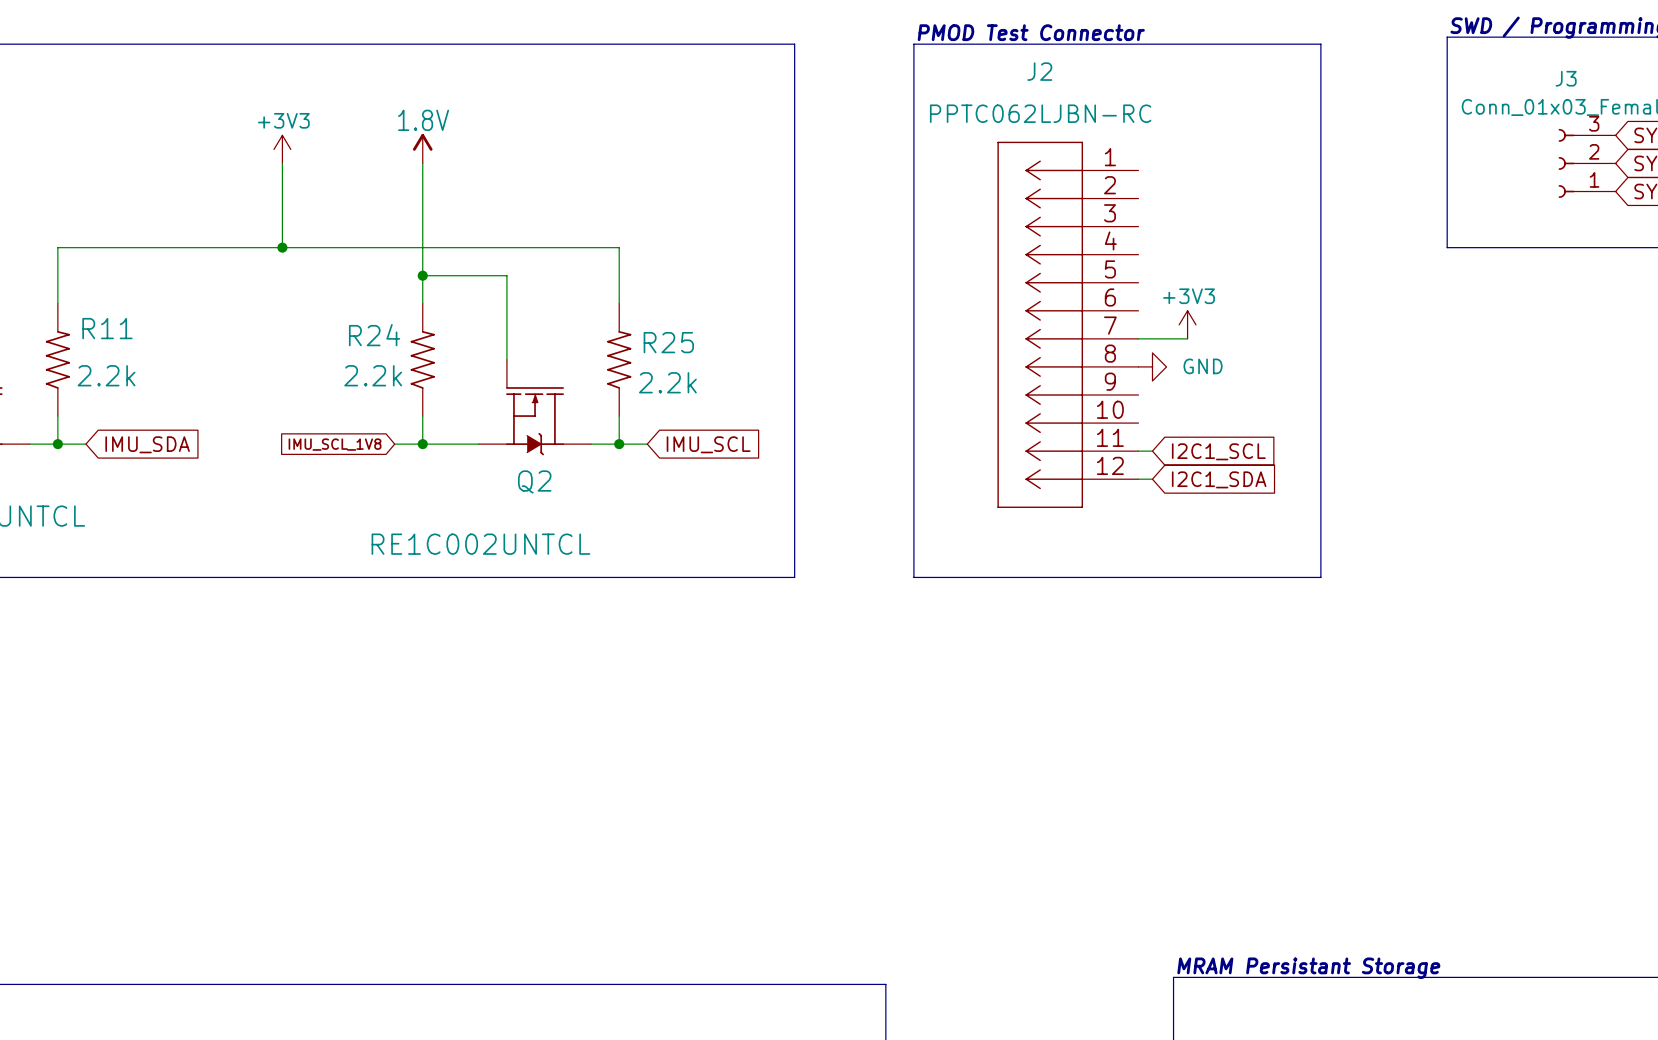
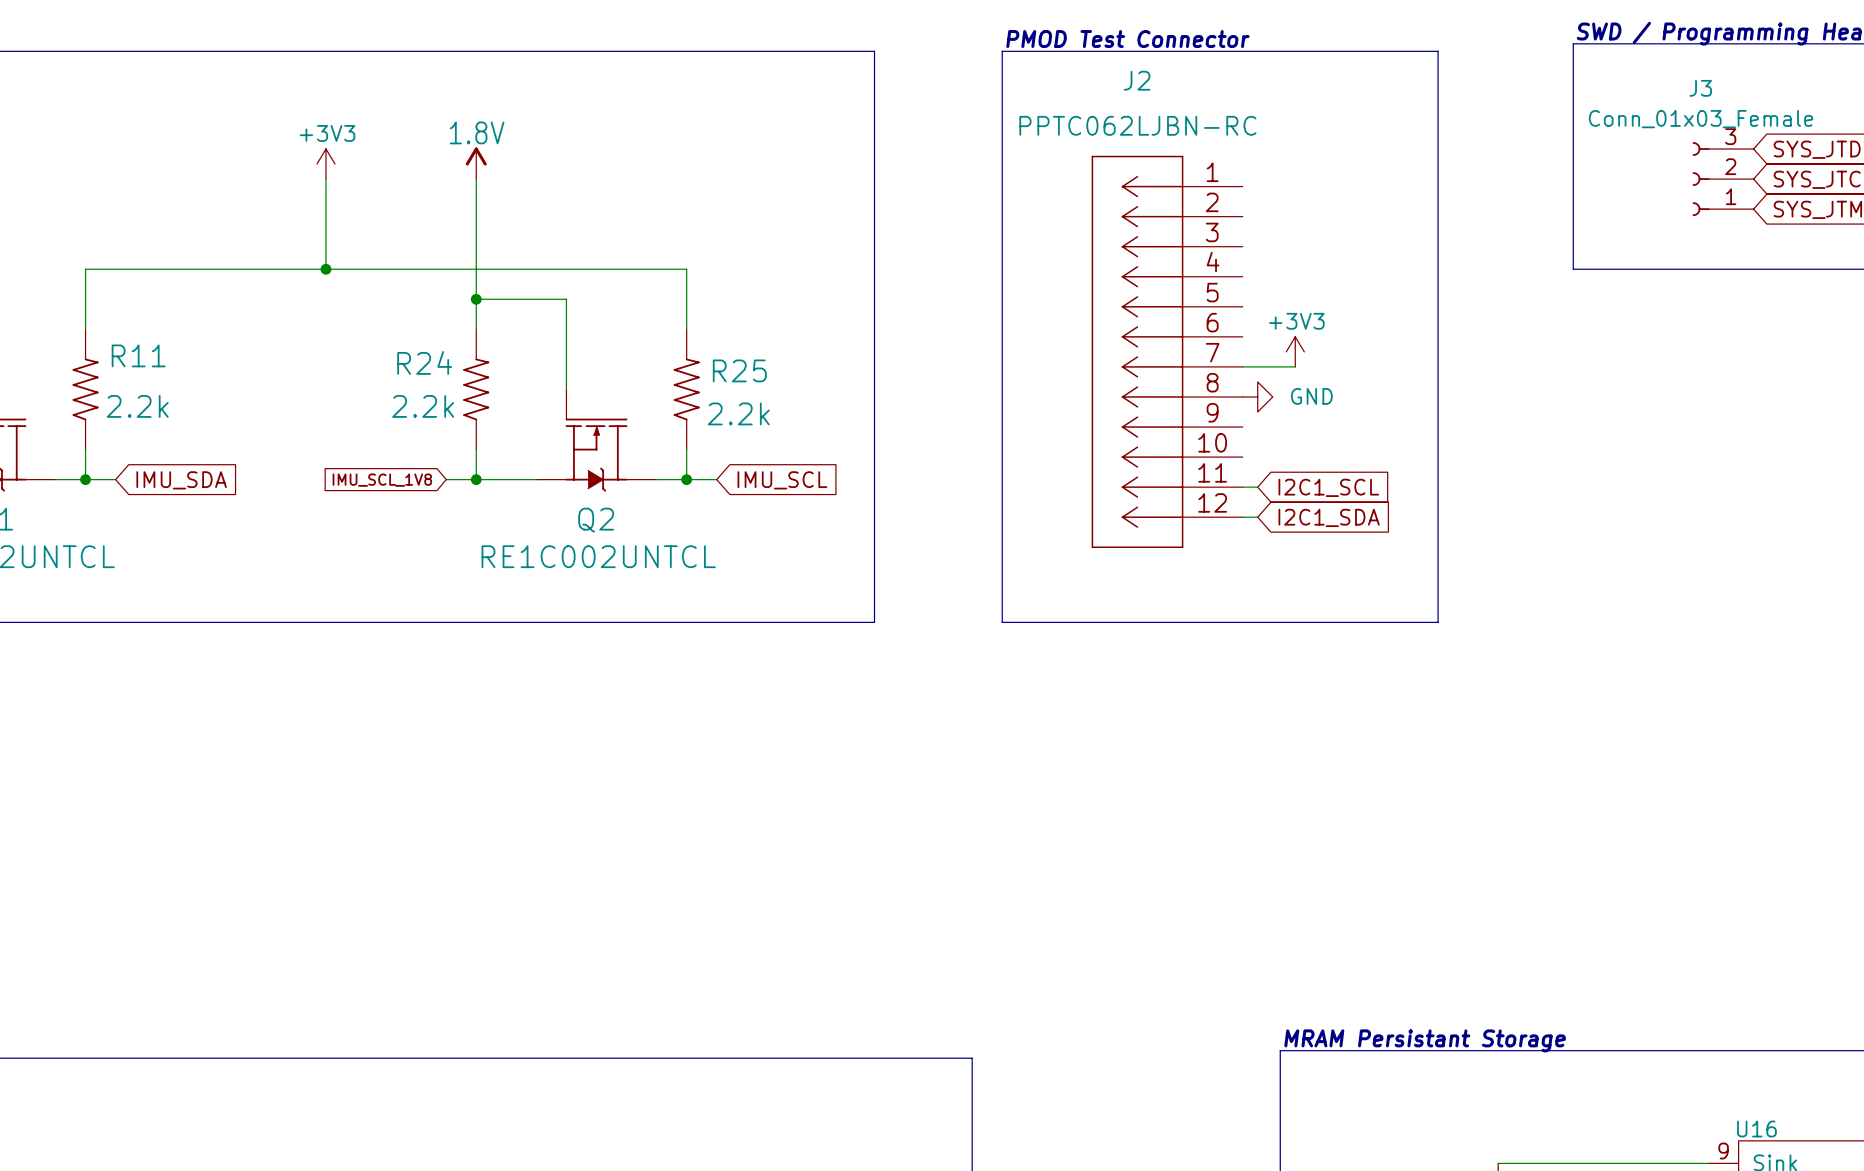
Q2 value position: RE1C002UNTCL (480, 544) -> RE1C002UNTCL (598, 556)

